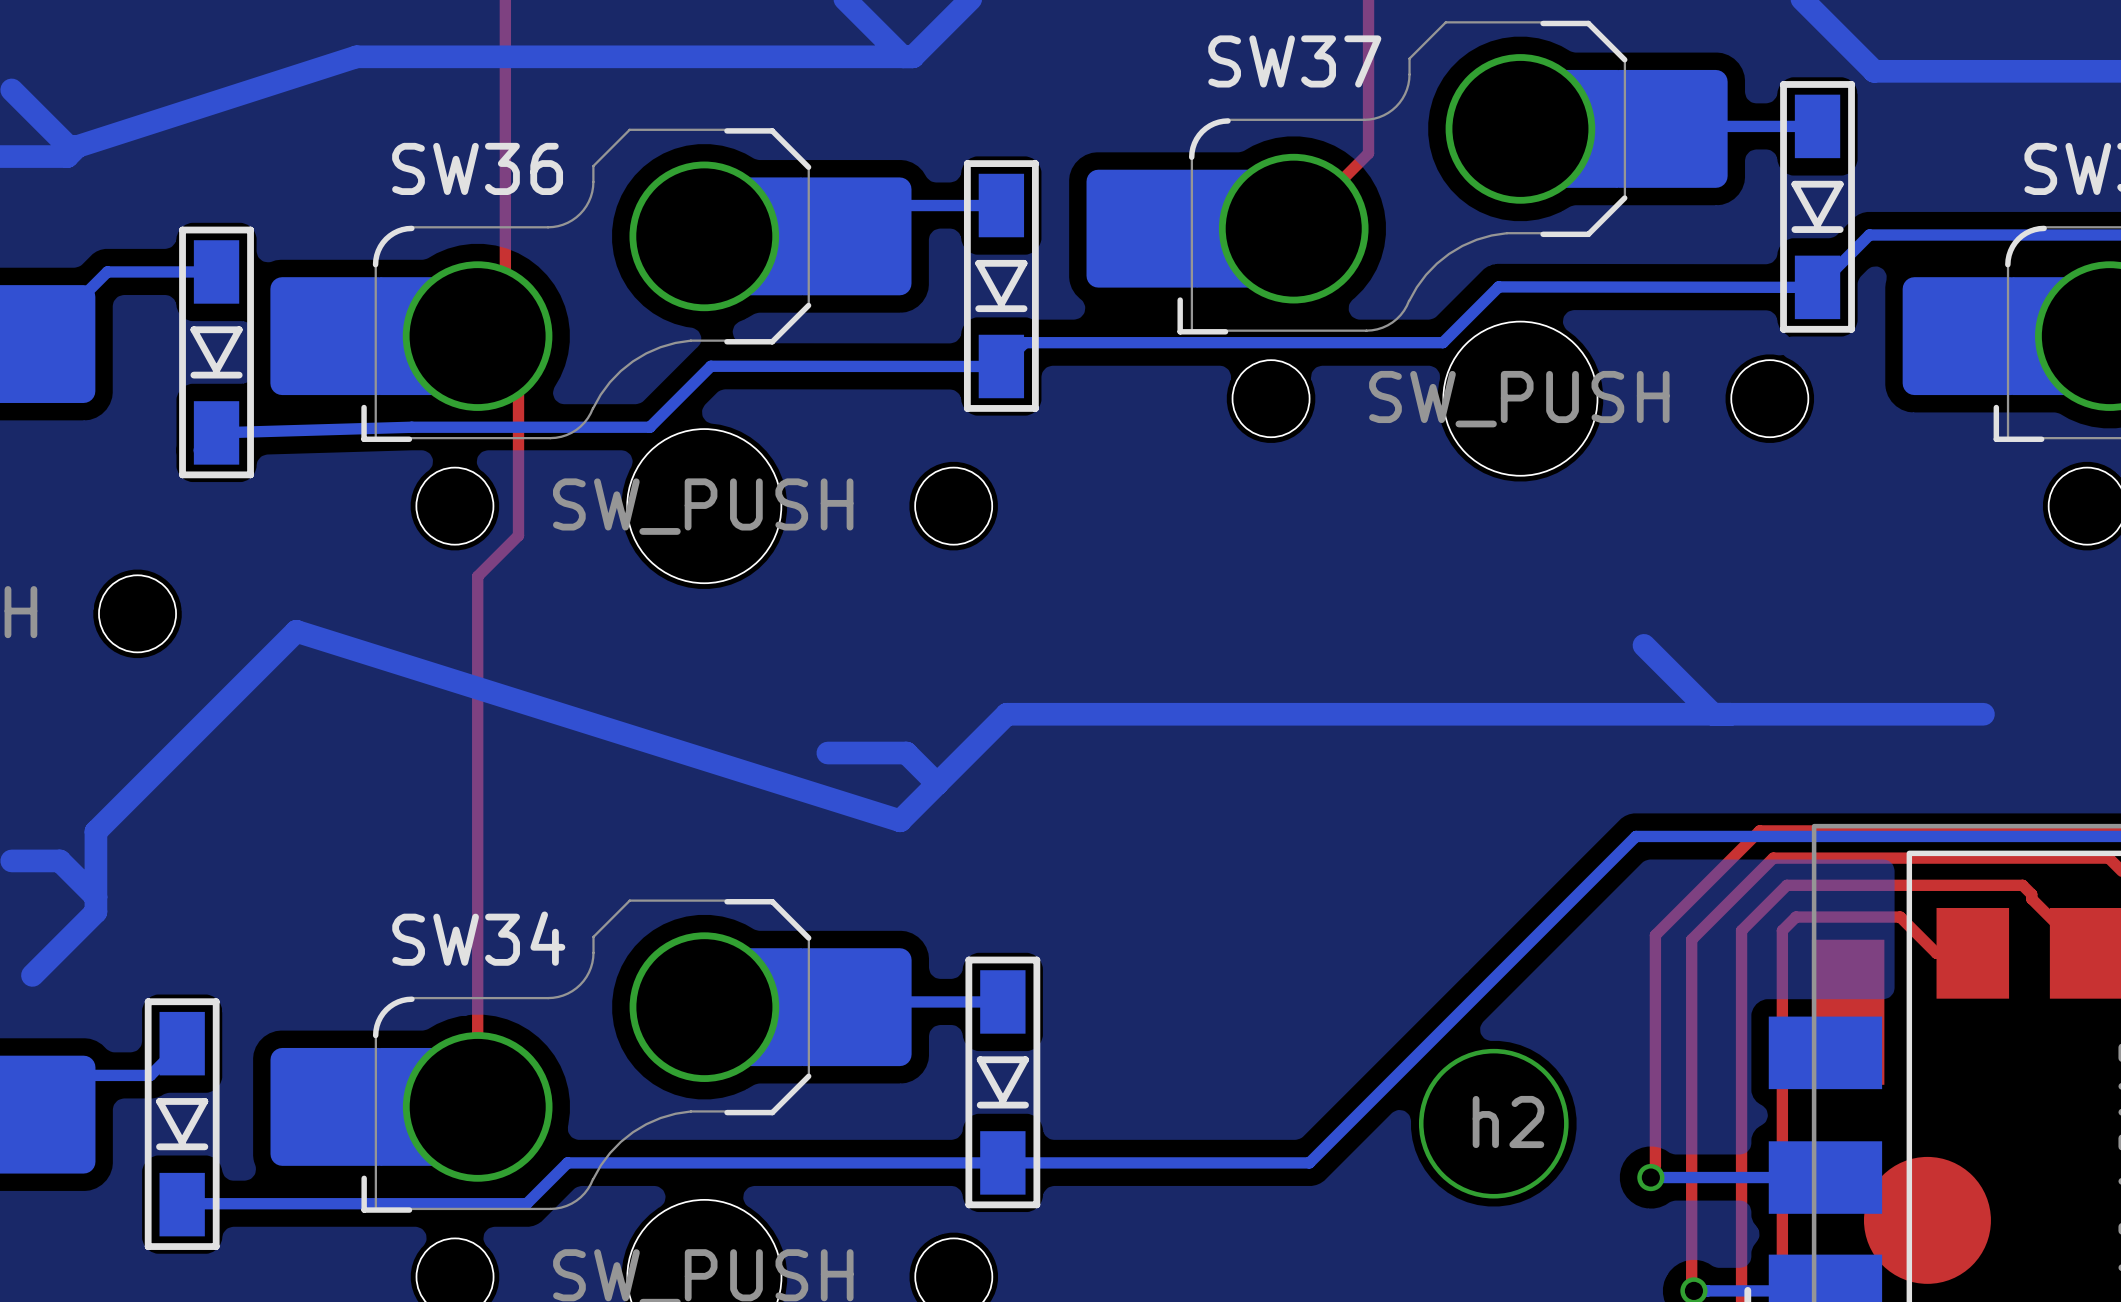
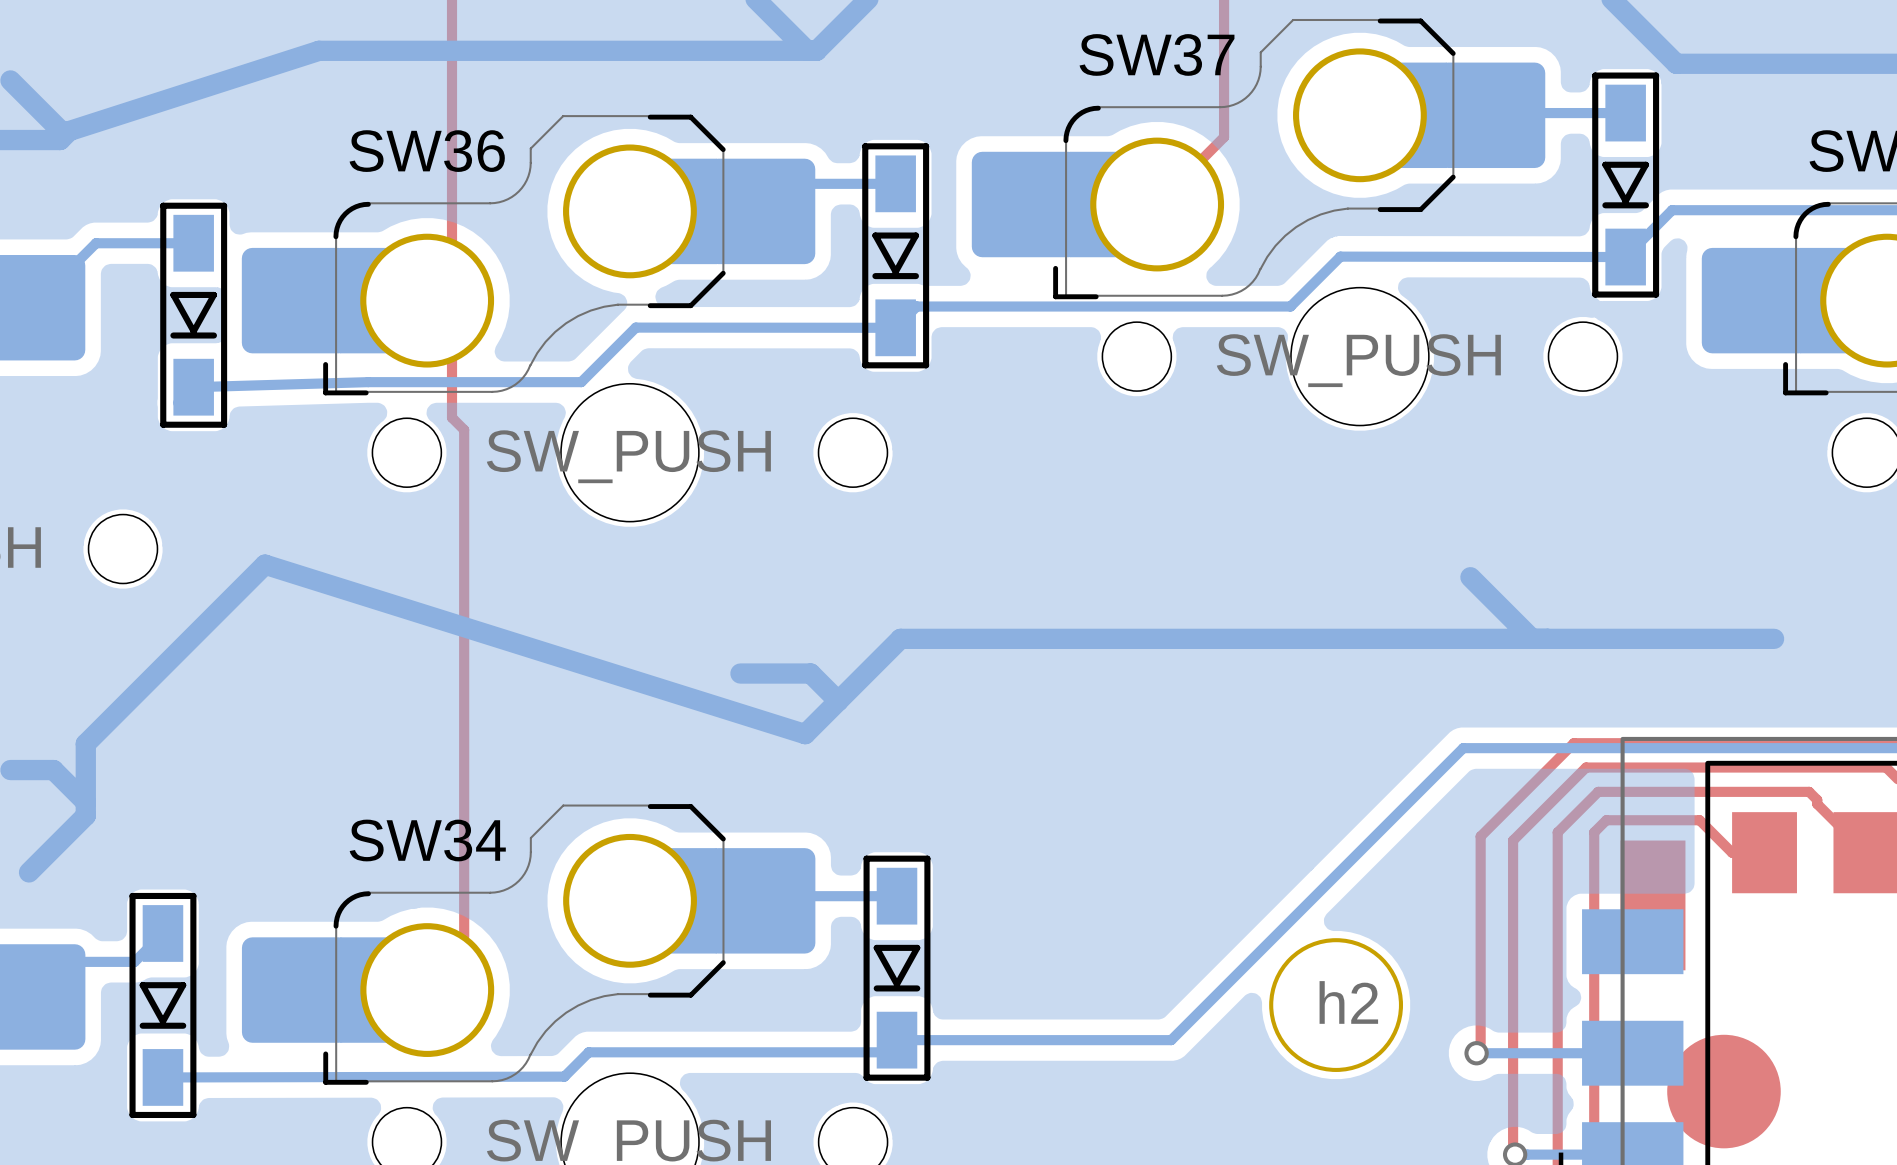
top track: none -> (452, 275) (452, 417) (464, 429) (464, 936)
top track: (518, 395) (518, 535) (477, 576) (477, 1106) -> none
bottom track: (1002, 1162) (567, 1162) (526, 1203) (200, 1203) -> none
bottom track: none -> (880, 1052) (588, 1052) (564, 1076) (162, 1077)

